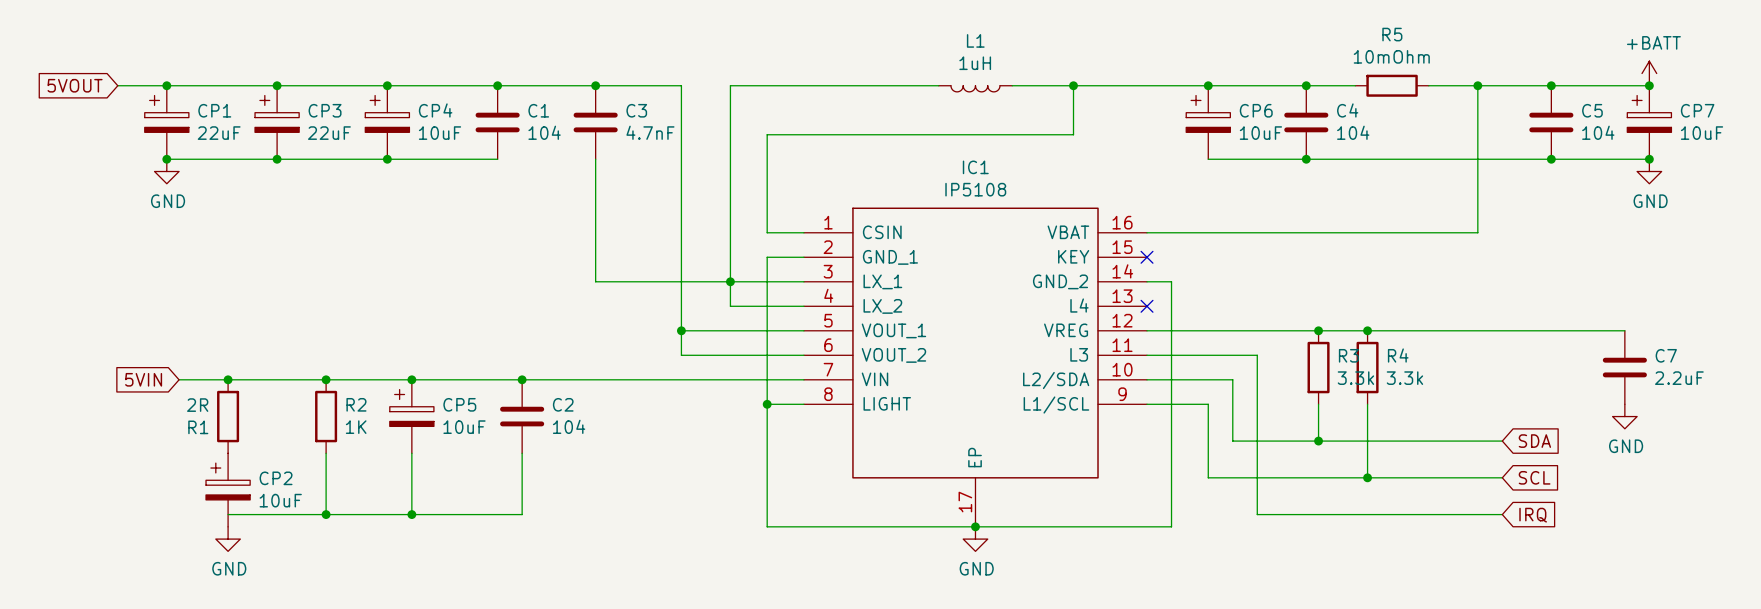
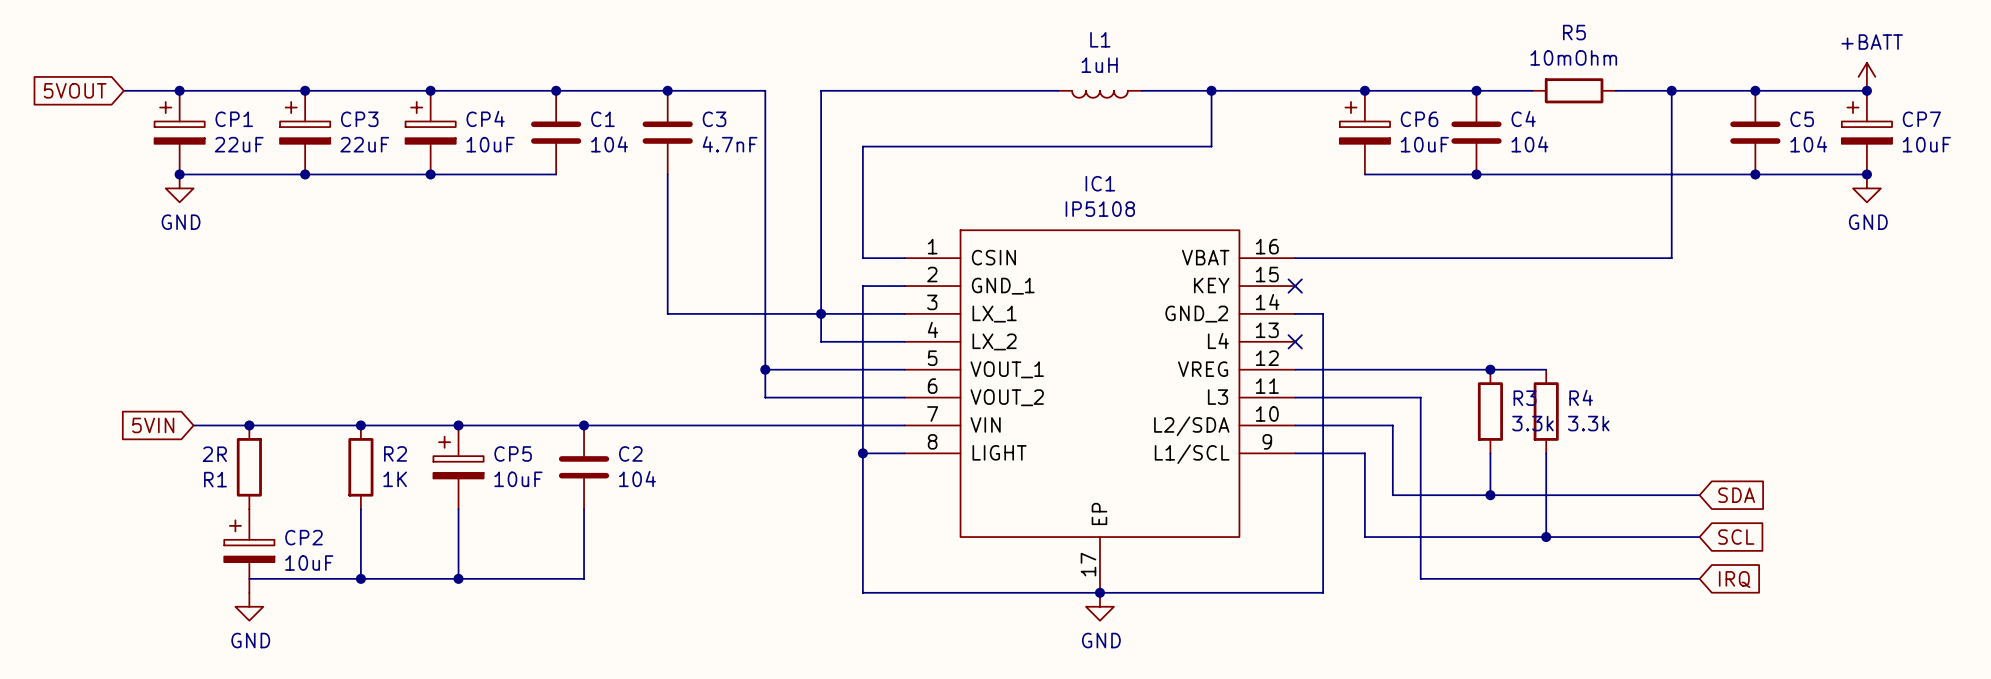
wire: (1367, 330) (1624, 330) -> none
junction: (1367, 330) -> none
C7: 2.2uF (1624, 367) -> none
power symbol: GND (1624, 416) -> none

